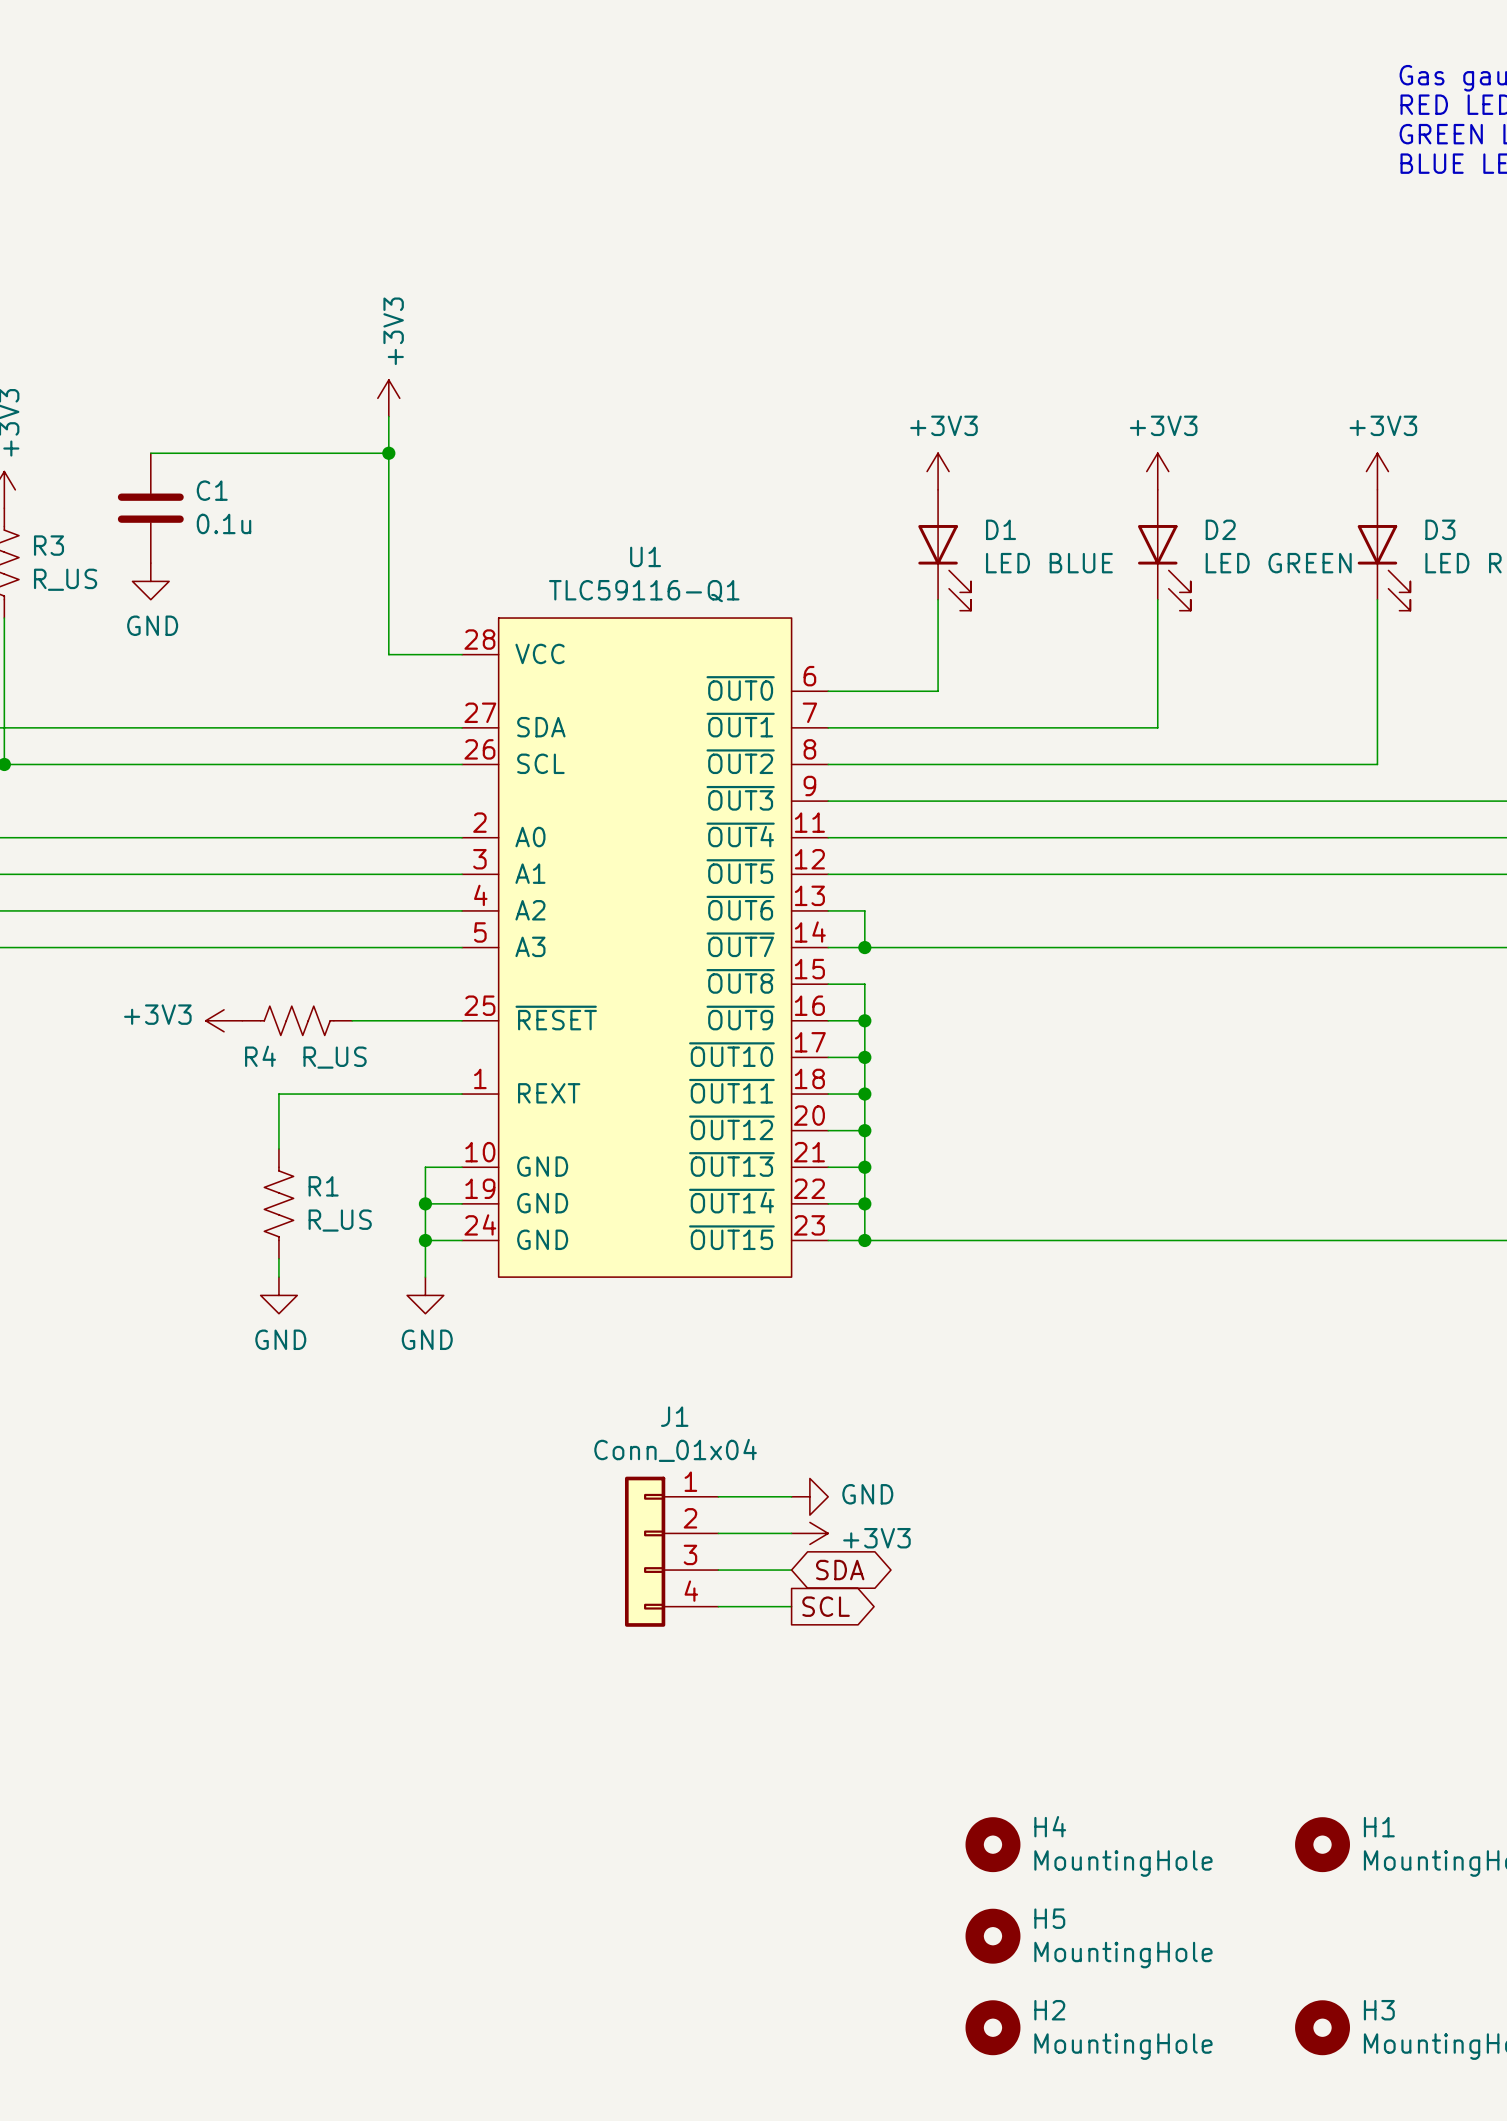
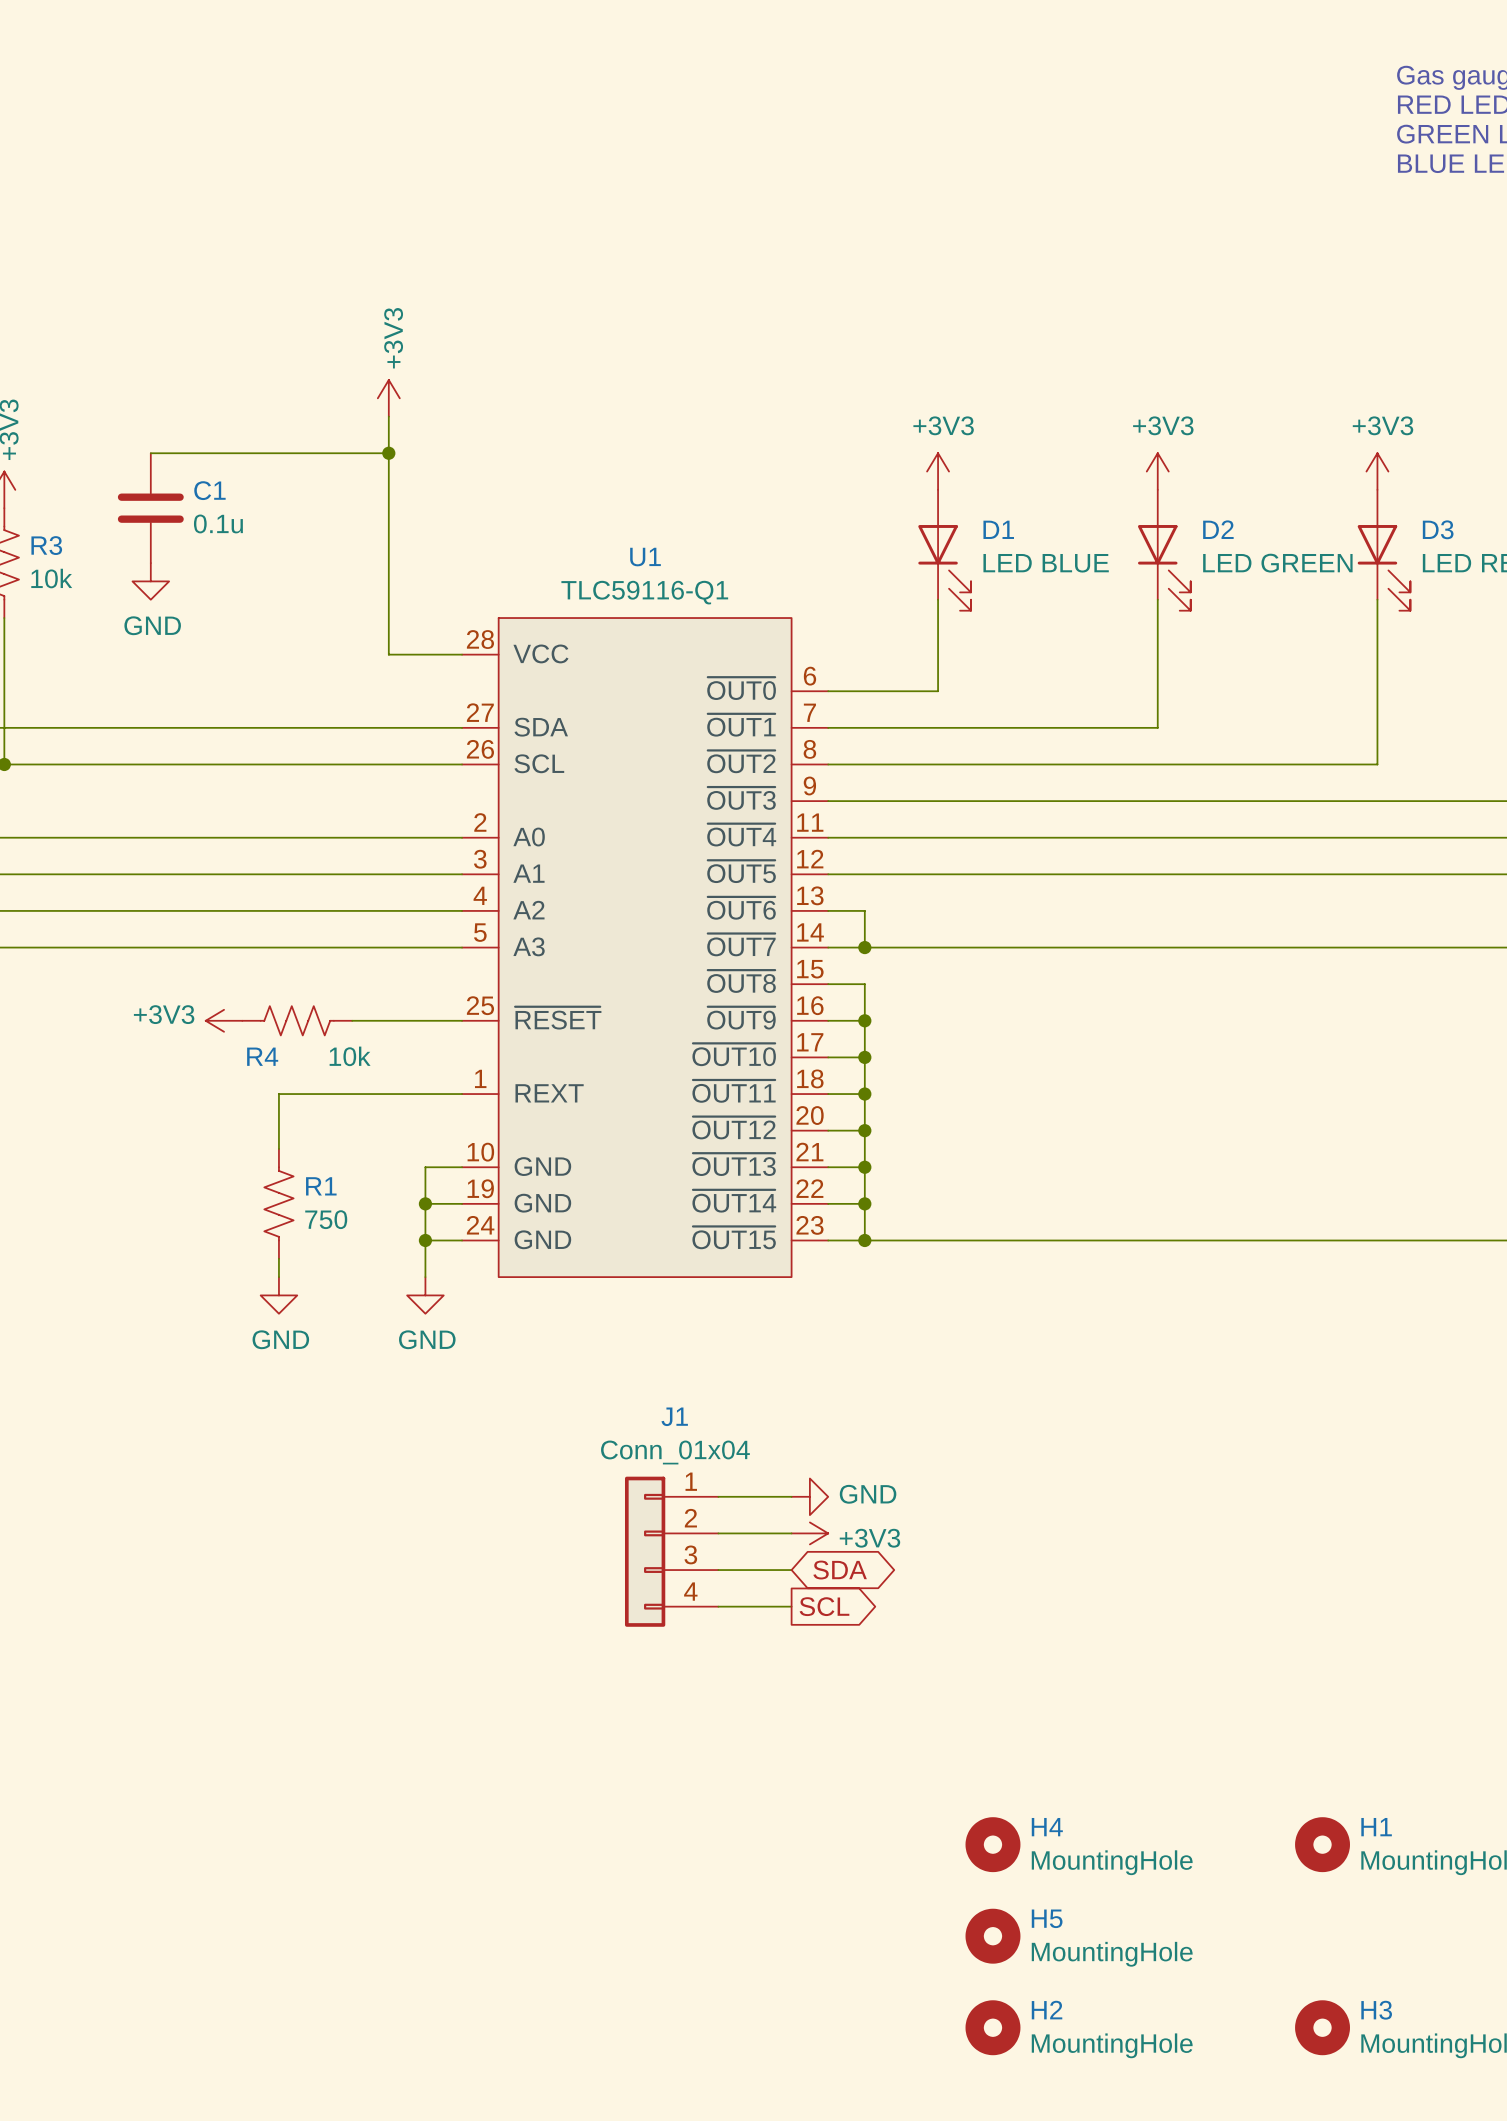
R3 value: R_US (65, 579) -> 10k (51, 578)
R4 value: R_US (335, 1057) -> 10k (350, 1056)
R1 value: R_US (340, 1220) -> 750 (326, 1219)

